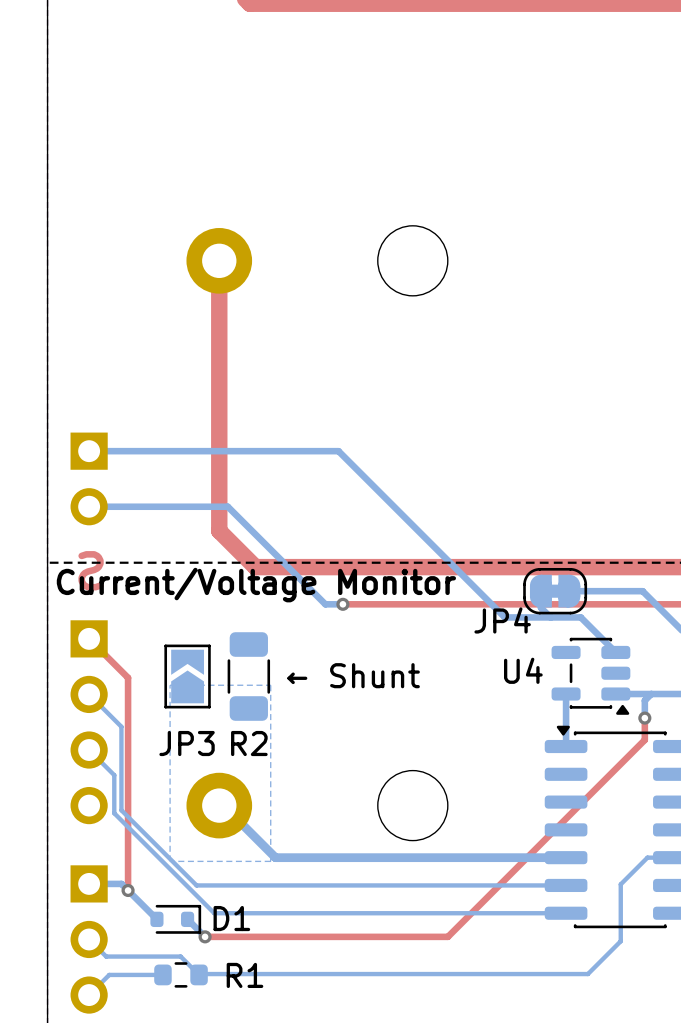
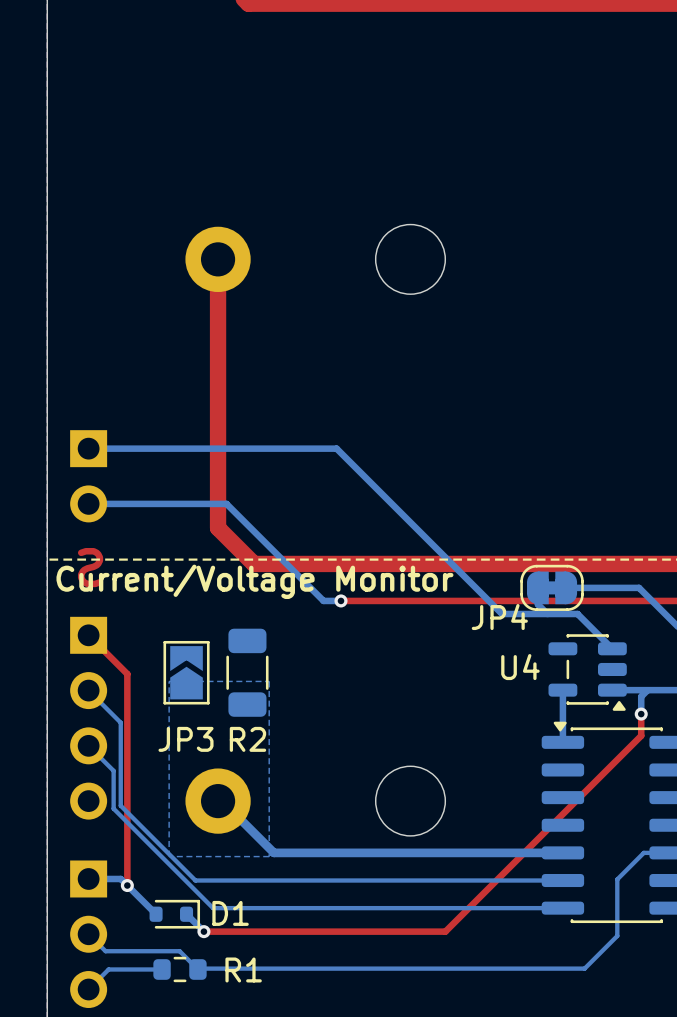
text: ← Shunt (353, 675) -> none

